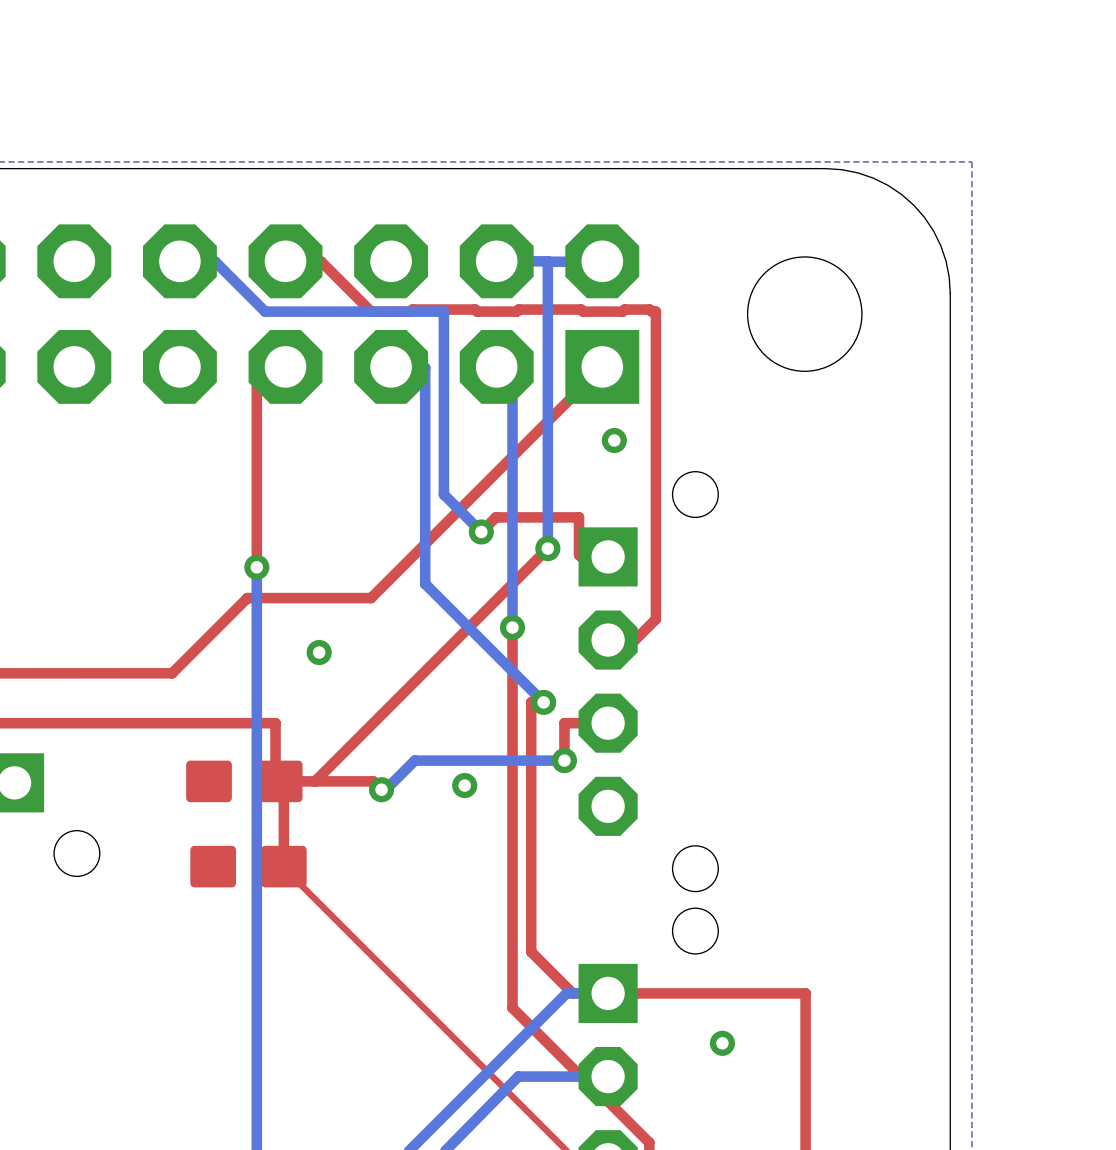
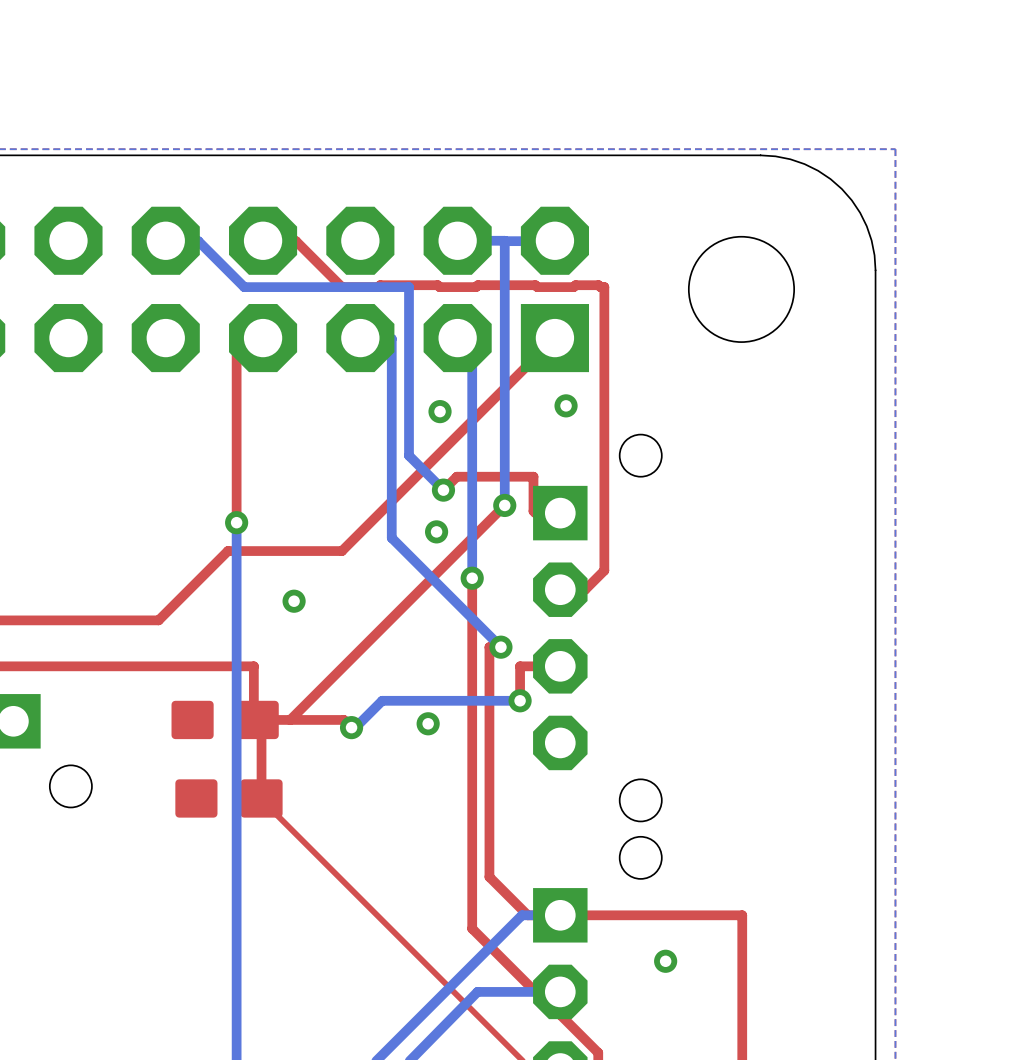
via: none -> (440, 411)
via: none -> (436, 531)

